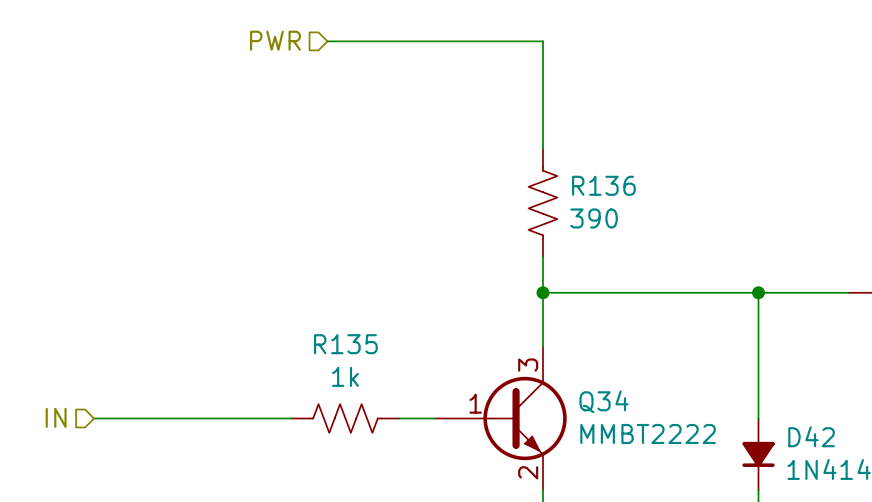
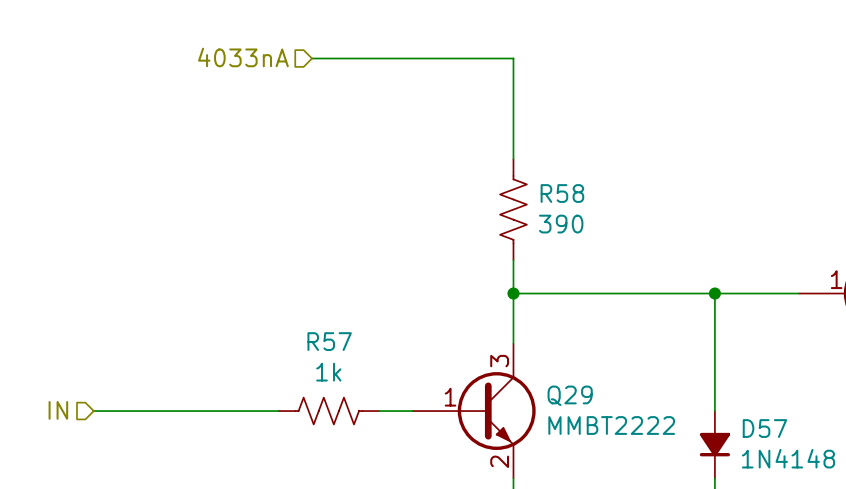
hierarchical label: PWR (275, 40) -> 4033nA (243, 57)
R136 name: R136 (603, 185) -> R58 (562, 193)
R135 name: R135 (345, 344) -> R57 (329, 341)
Q34 name: Q34 (604, 401) -> Q29 (570, 395)
D42 name: D42 (811, 436) -> D57 (764, 428)

